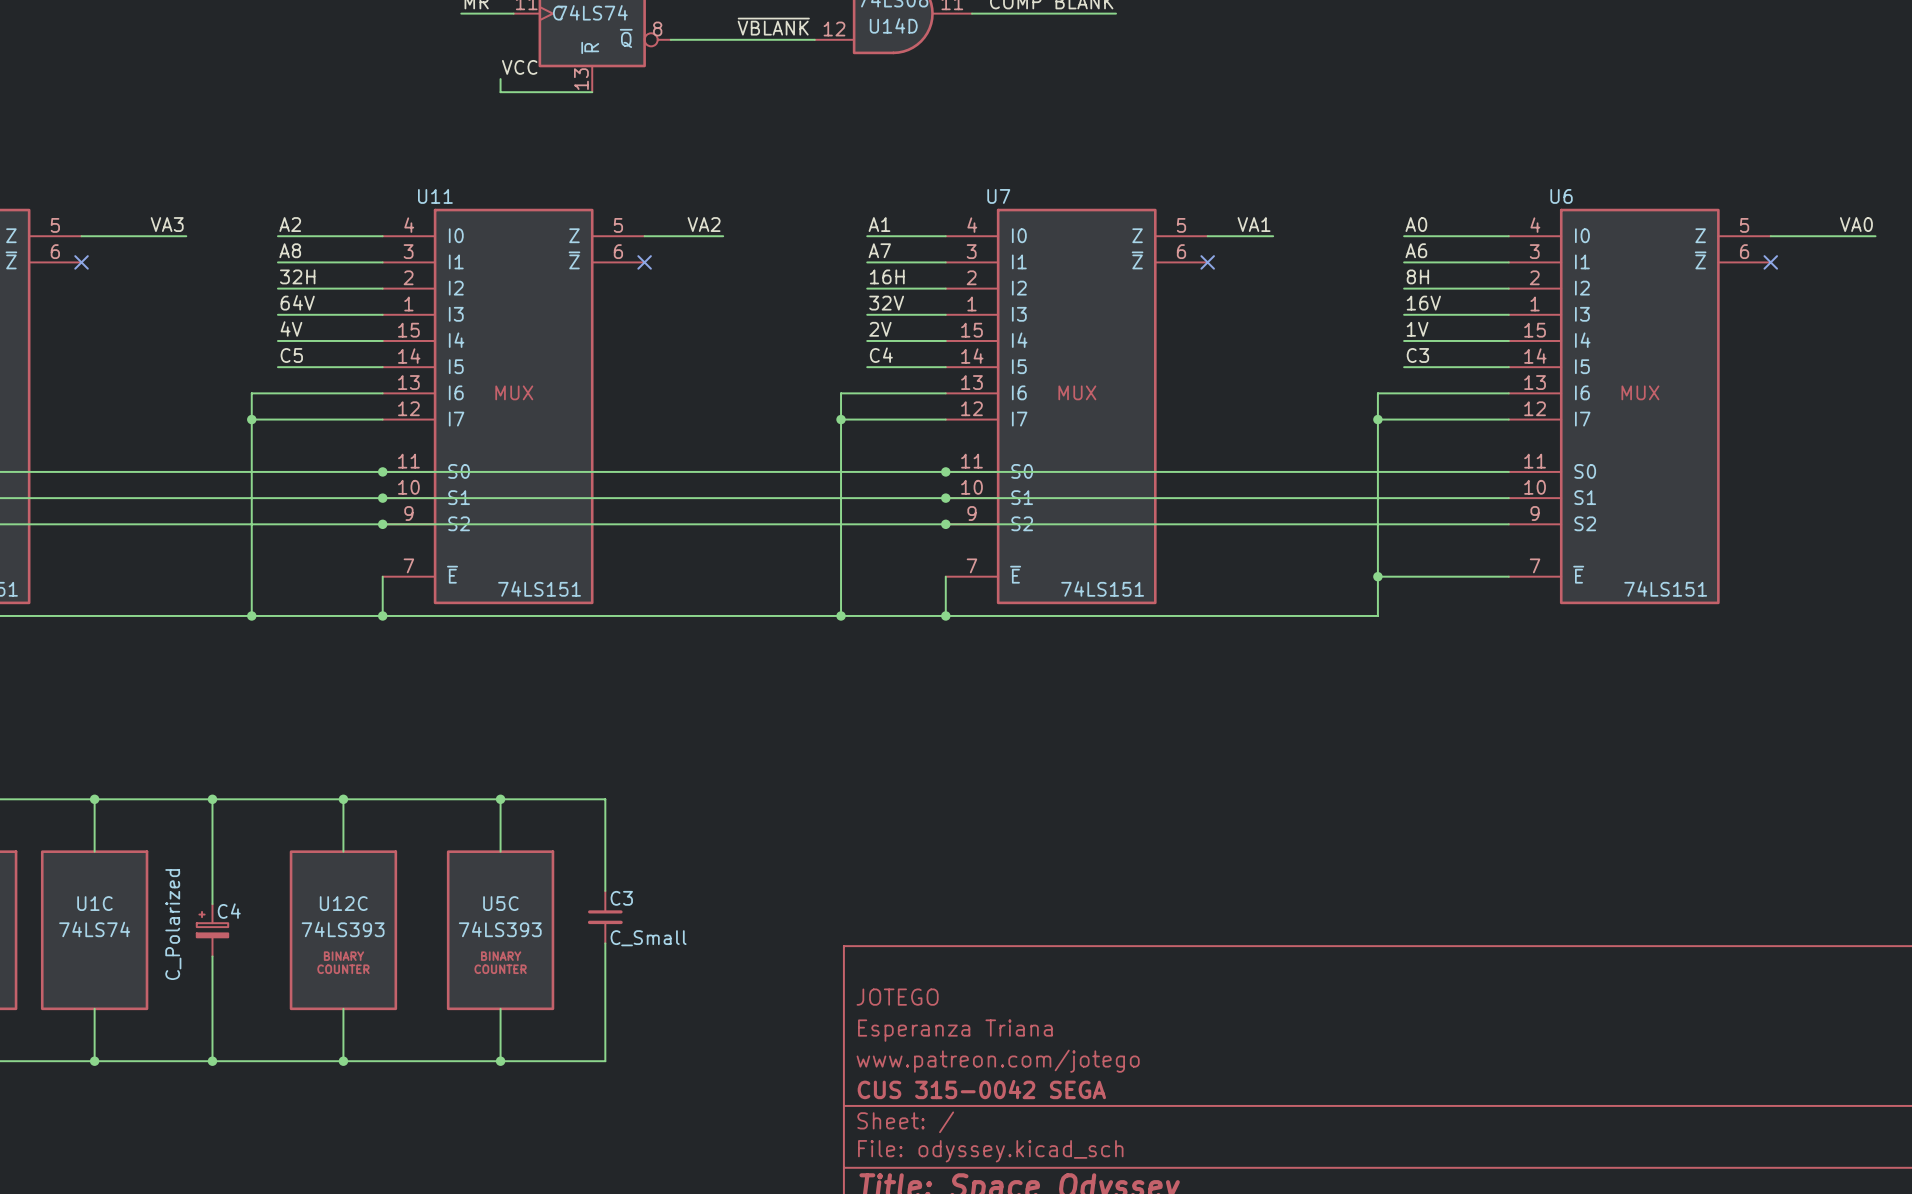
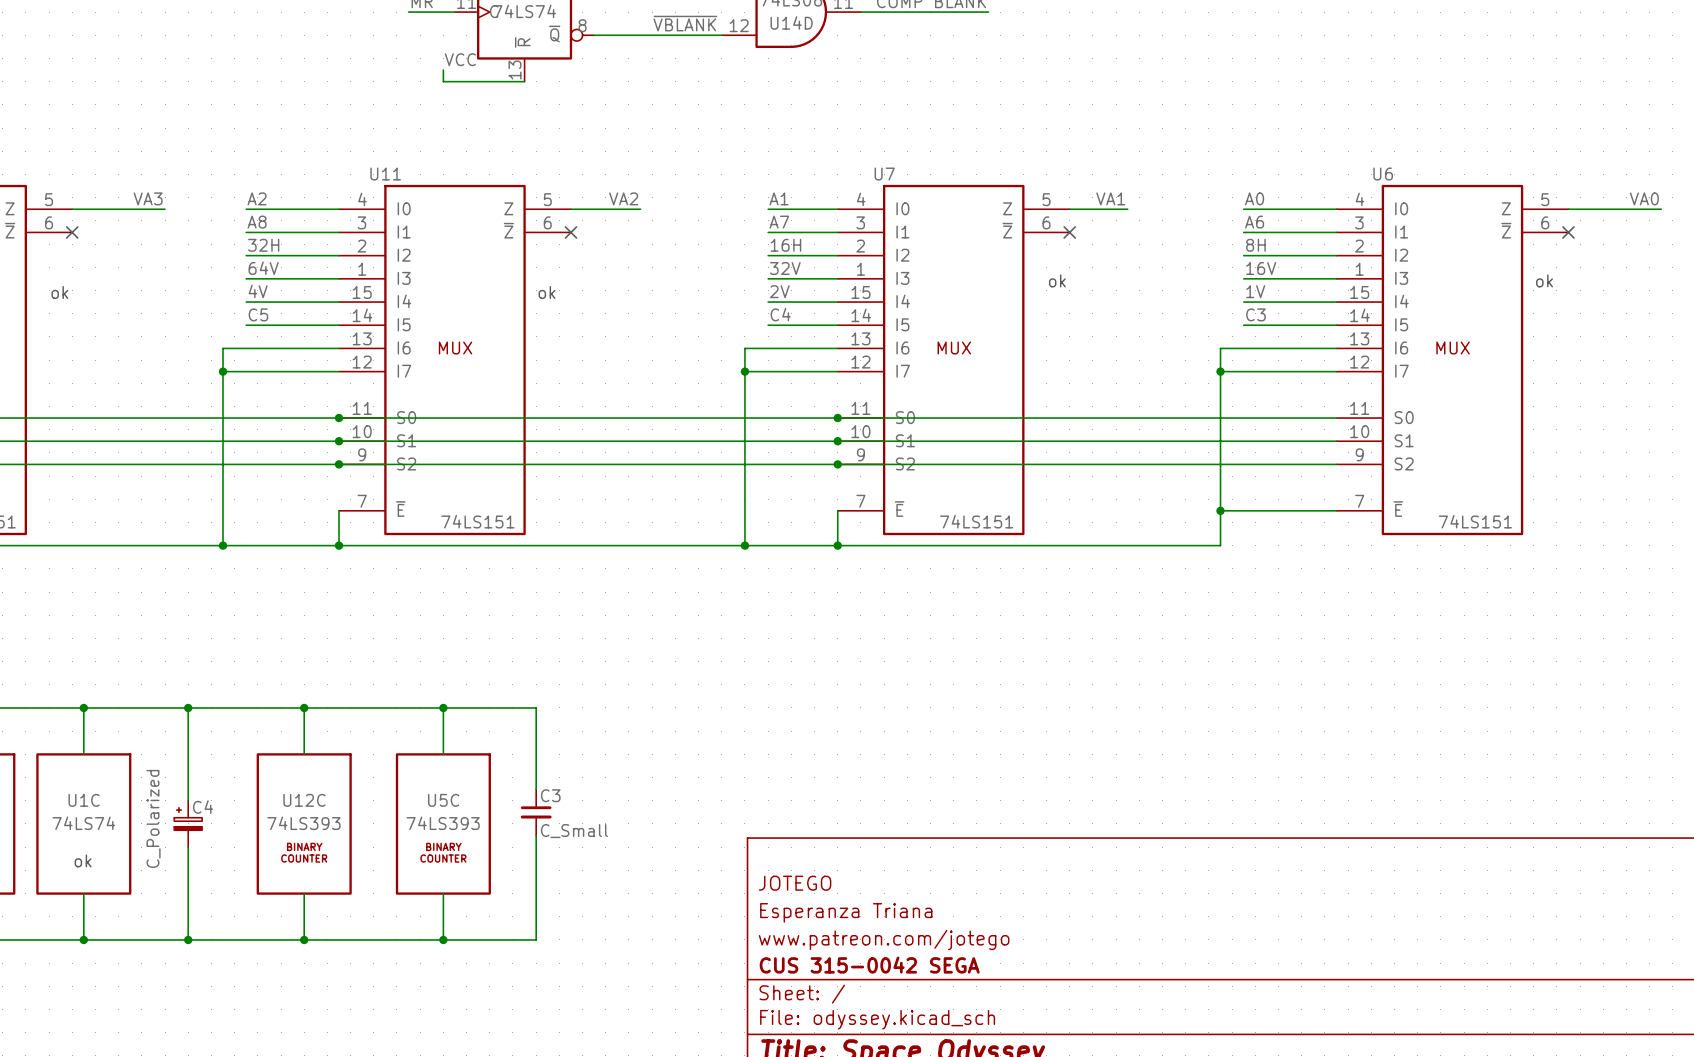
text: none -> ok (1057, 280)
text: none -> ok (1544, 280)
text: none -> ok (59, 292)
text: none -> ok (547, 292)
text: none -> ok (83, 860)

